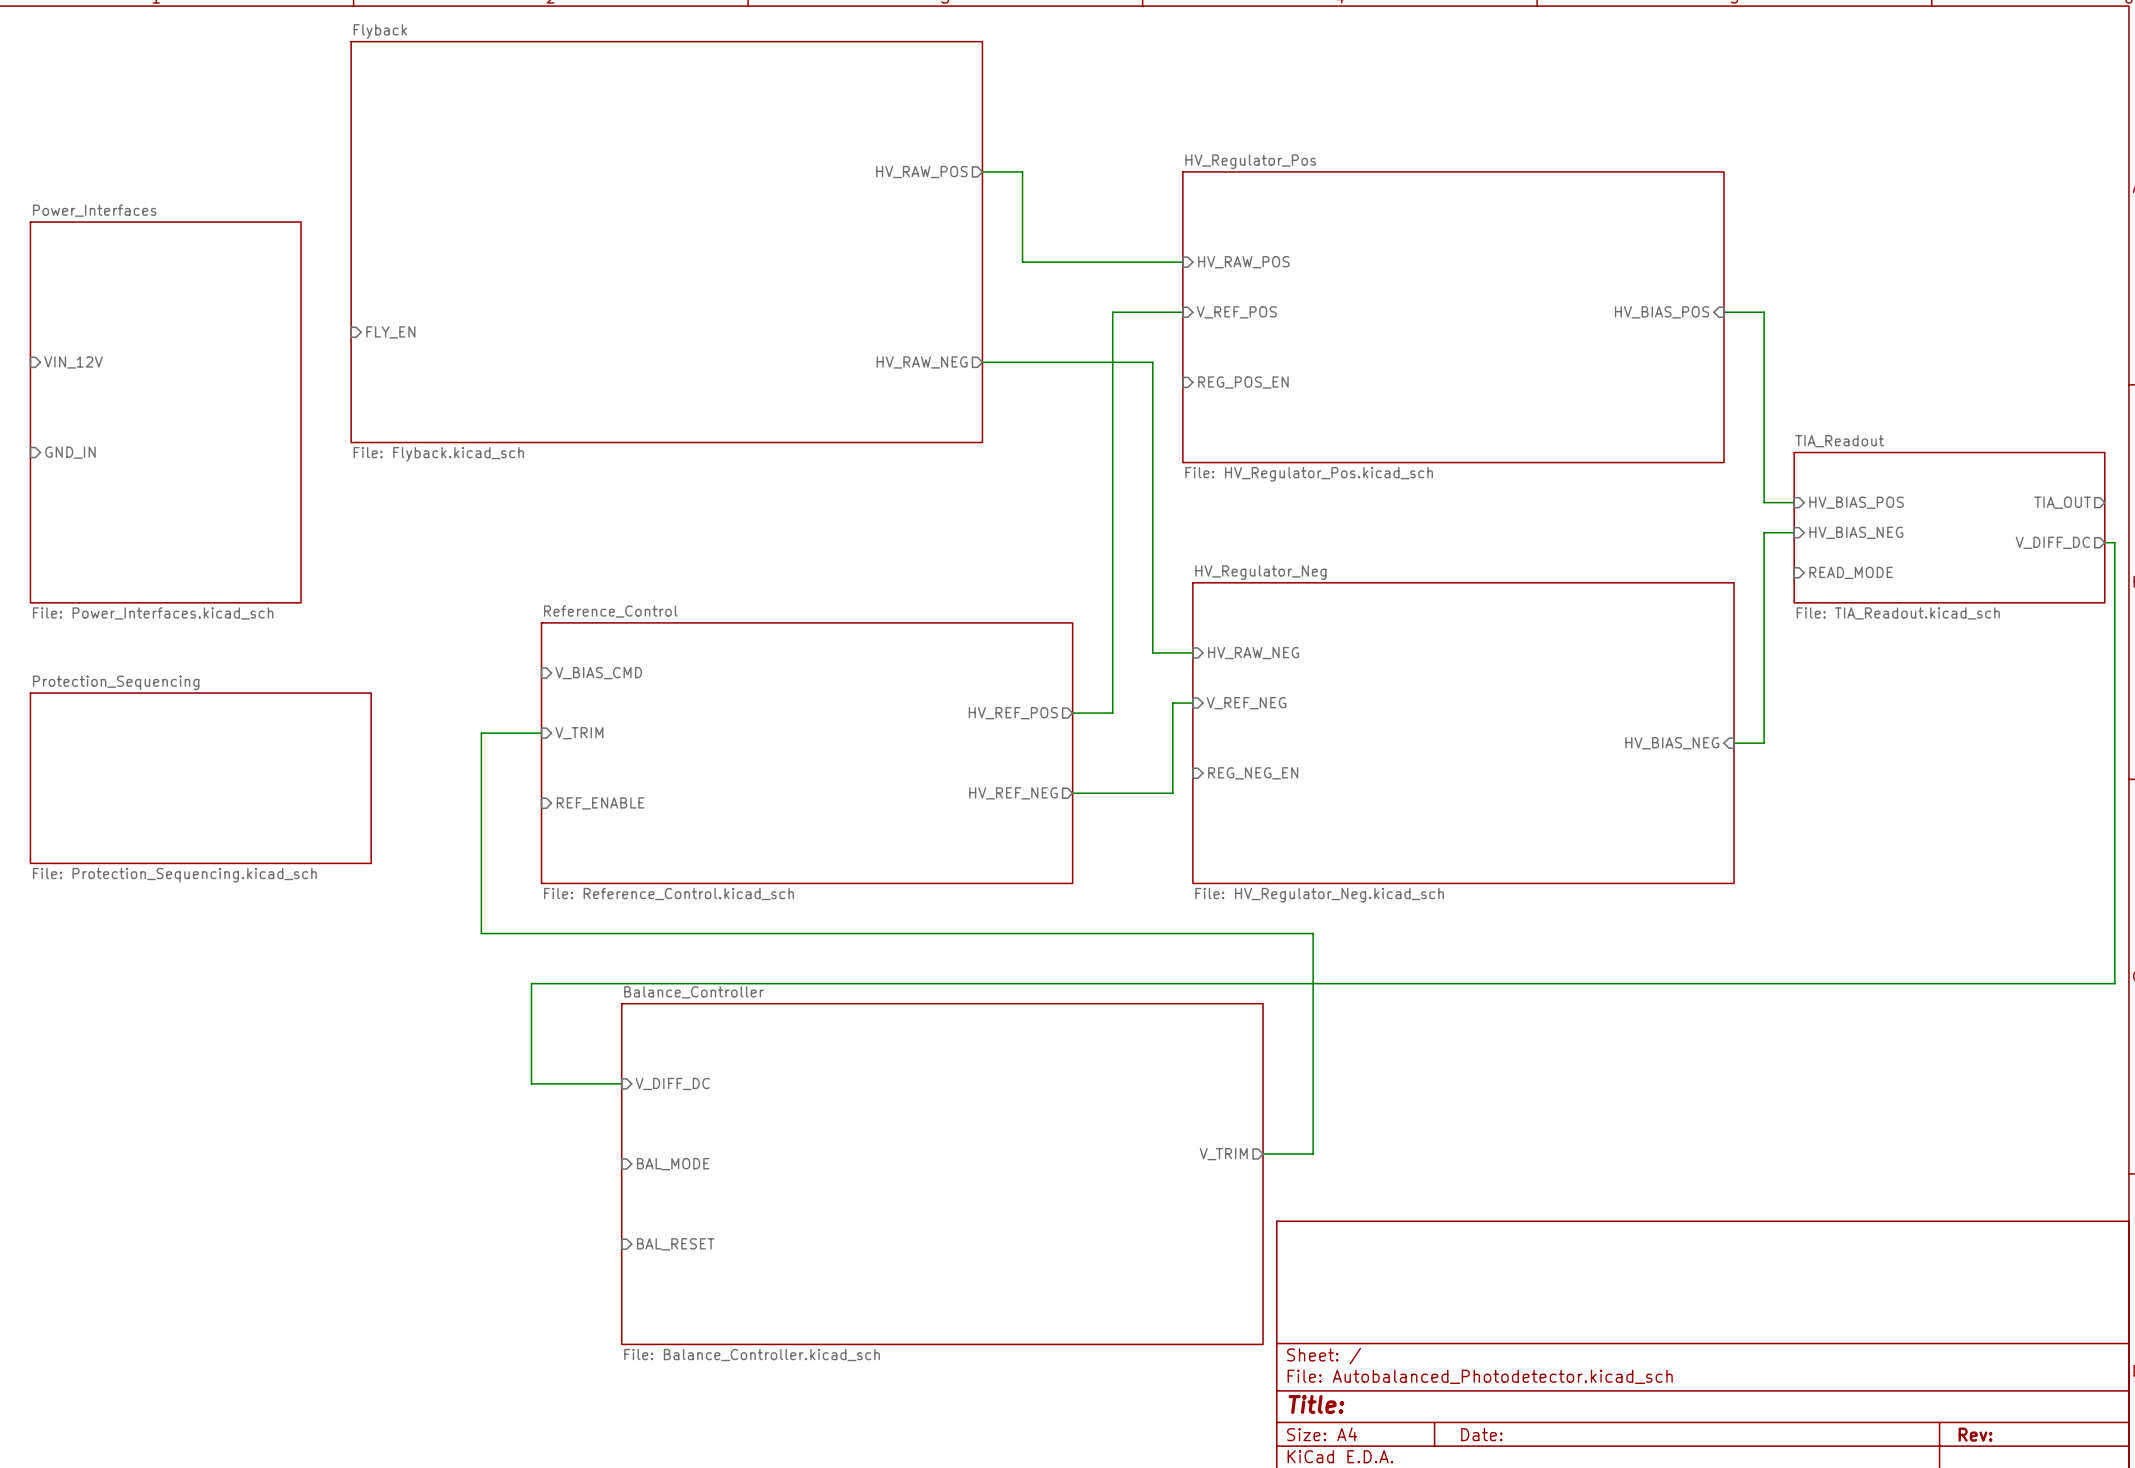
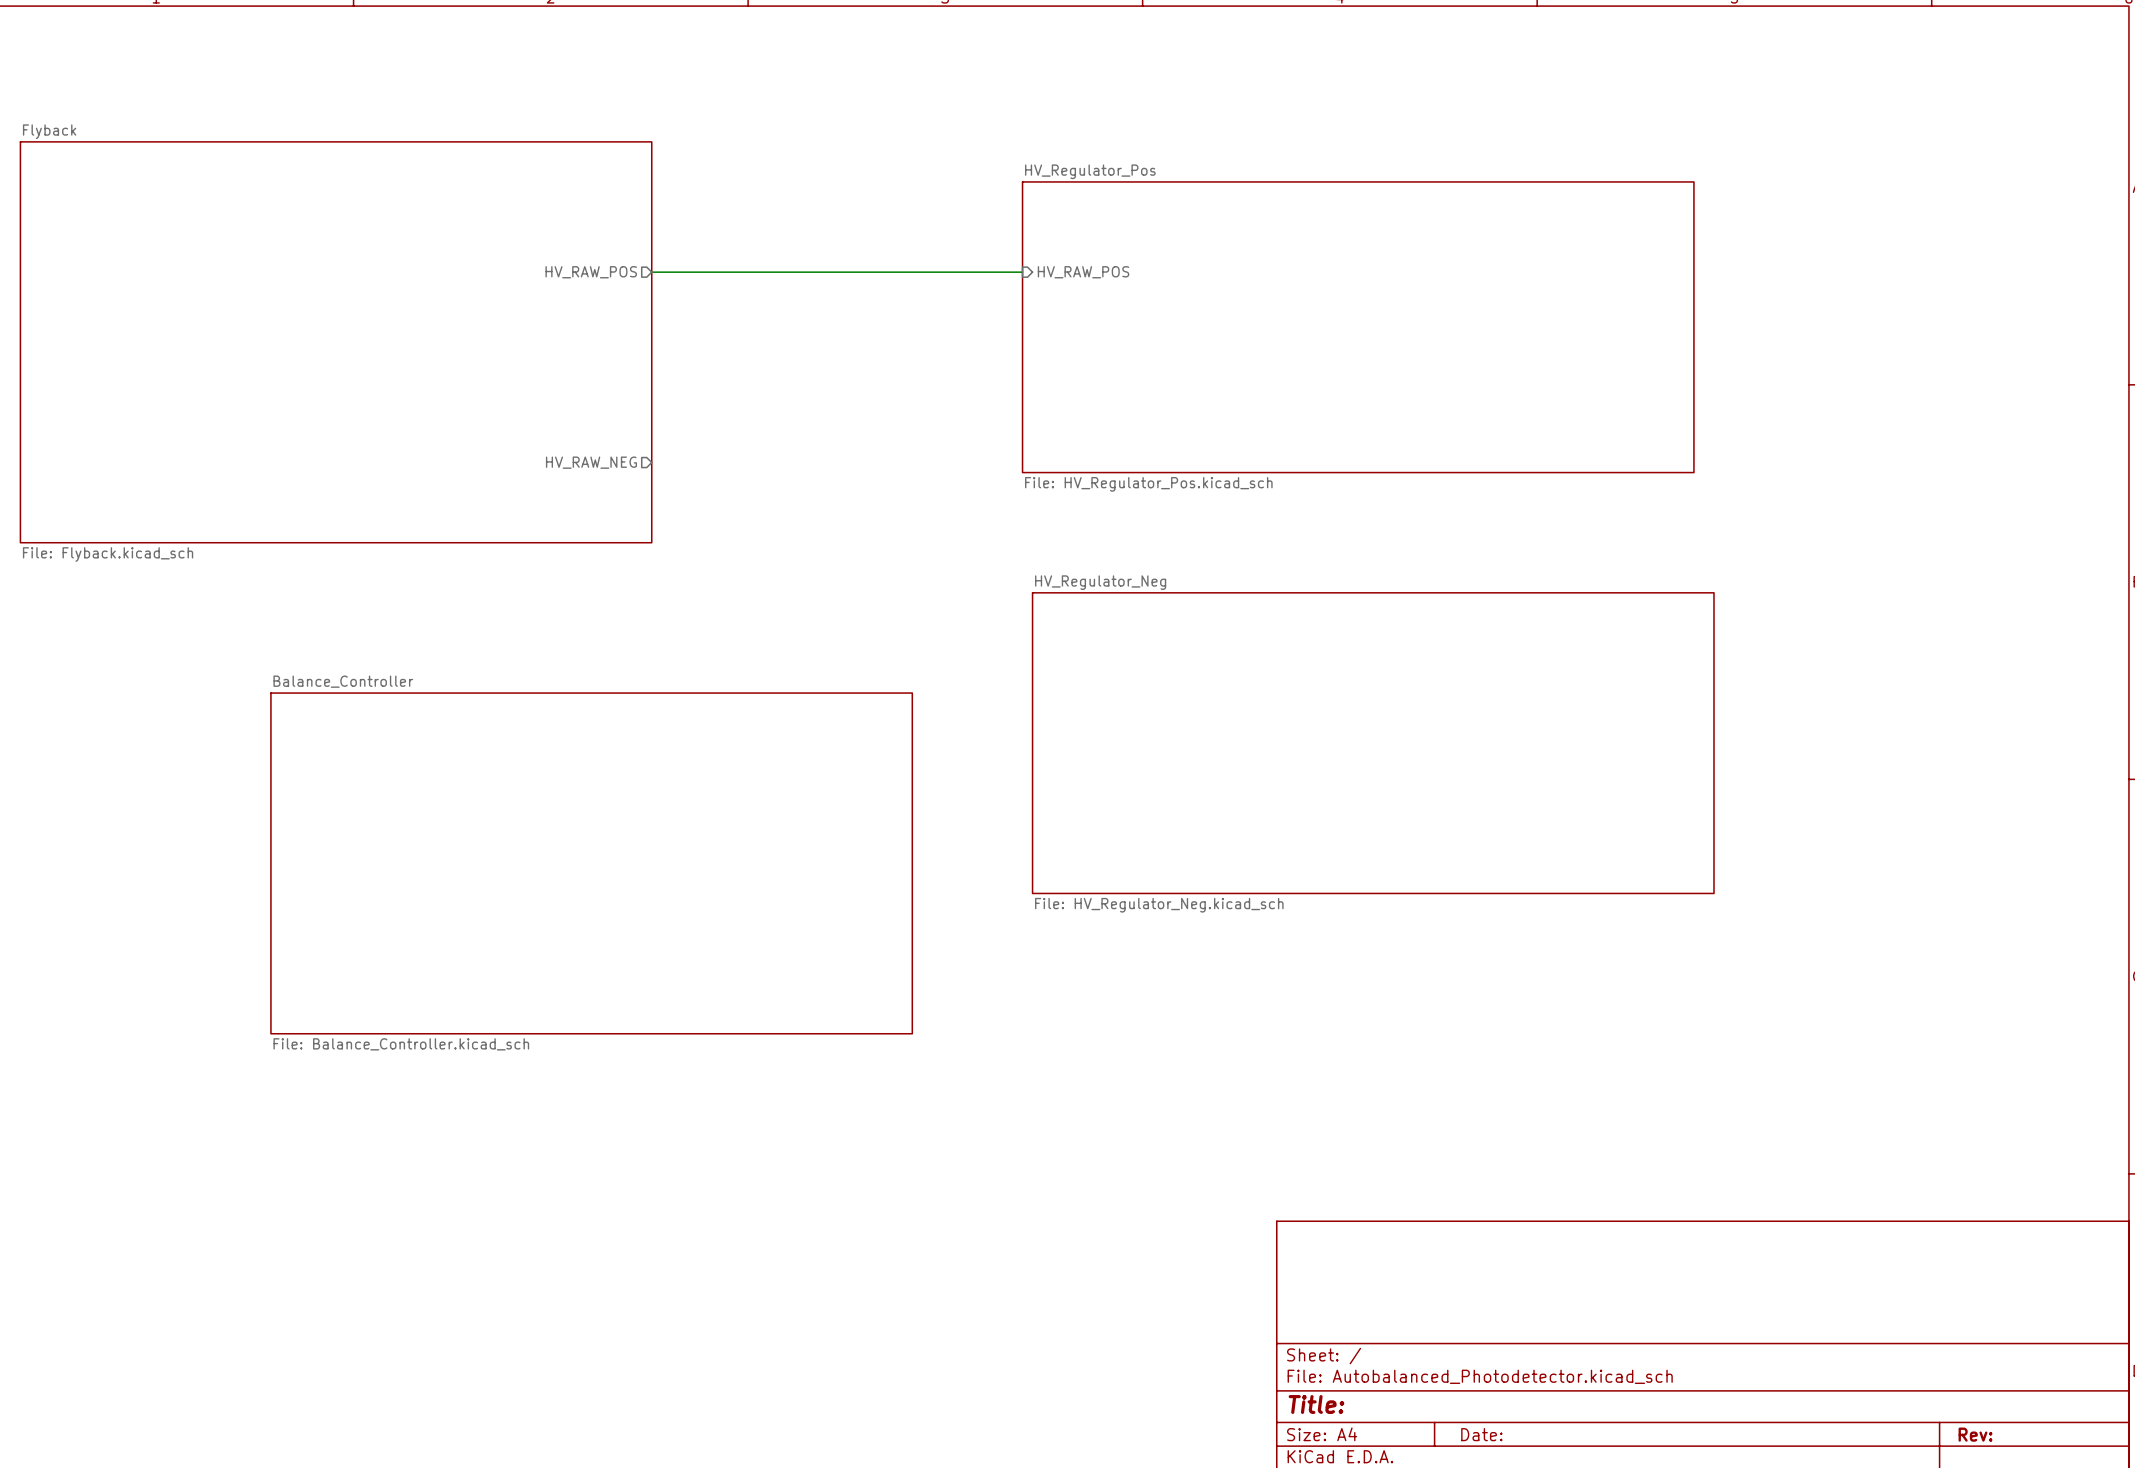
wire: (982, 171) (1022, 171) (1022, 262) (1182, 262) -> none
sheet pin: HV_RAW_POS (921, 172) -> none
sheet Flyback: File: Flyback.kicad_sch (666, 242) -> none
sheet pin: HV_RAW_POS (1243, 262) -> none
sheet pin: none -> HV_RAW_POS (591, 272)
wire: none -> (651, 272) (1022, 272)
sheet pin: none -> HV_RAW_POS (1083, 272)
wire: (1182, 312) (1112, 312) (1112, 713) (1072, 713) -> none
sheet pin: V_REF_POS (1236, 312) -> none
sheet pin: HV_BIAS_POS (1662, 312) -> none
wire: (1724, 312) (1764, 312) (1764, 502) (1794, 502) -> none
sheet HV_Regulator_Pos: File: HV_Regulator_Pos.kicad_sch (1453, 317) -> none
sheet HV_Regulator_Pos: none -> File: HV_Regulator_Pos.kicad_sch (1358, 327)
sheet pin: FLY_EN (390, 332) -> none
sheet Flyback: none -> File: Flyback.kicad_sch (336, 342)
sheet pin: VIN_12V (73, 362) -> none
sheet pin: HV_RAW_NEG (922, 362) -> none
wire: (982, 362) (1152, 362) (1152, 652) (1192, 652) -> none
sheet pin: REG_POS_EN (1243, 382) -> none
sheet Power_Interfaces: File: Power_Interfaces.kicad_sch (165, 412) -> none
sheet pin: GND_IN (70, 452) -> none
sheet pin: none -> HV_RAW_NEG (591, 462)
sheet pin: HV_BIAS_POS (1856, 502) -> none
sheet pin: TIA_OUT (2062, 502) -> none
sheet TIA_Readout: File: TIA_Readout.kicad_sch (1949, 527) -> none
wire: (1794, 532) (1764, 532) (1764, 743) (1734, 743) -> none
sheet pin: HV_BIAS_NEG (1856, 532) -> none
sheet pin: V_DIFF_DC (2052, 542) -> none
wire: (2104, 542) (2114, 542) (2114, 983) (531, 983) (531, 1083) (621, 1083) -> none
sheet pin: READ_MODE (1851, 572) -> none
sheet pin: HV_RAW_NEG (1253, 653) -> none
sheet pin: V_BIAS_CMD (598, 673) -> none
wire: (1192, 703) (1172, 703) (1172, 793) (1072, 793) -> none
sheet pin: V_REF_NEG (1246, 703) -> none
sheet pin: HV_REF_POS (1013, 713) -> none
wire: (541, 733) (481, 733) (481, 933) (1313, 933) (1313, 1154) (1263, 1154) -> none
sheet pin: V_TRIM (579, 733) -> none
sheet HV_Regulator_Neg: File: HV_Regulator_Neg.kicad_sch (1463, 733) -> none
sheet HV_Regulator_Neg: none -> File: HV_Regulator_Neg.kicad_sch (1373, 743)
sheet pin: HV_BIAS_NEG (1672, 743) -> none
sheet Reference_Control: File: Reference_Control.kicad_sch (807, 753) -> none
sheet pin: REG_NEG_EN (1253, 773) -> none
sheet Protection_Sequencing: File: Protection_Sequencing.kicad_sch (200, 778) -> none
sheet pin: HV_REF_NEG (1013, 793) -> none
sheet pin: REF_ENABLE (600, 803) -> none
sheet Balance_Controller: none -> File: Balance_Controller.kicad_sch (591, 863)
sheet pin: V_DIFF_DC (672, 1083) -> none
sheet pin: V_TRIM (1223, 1154) -> none
sheet pin: BAL_MODE (673, 1164) -> none
sheet Balance_Controller: File: Balance_Controller.kicad_sch (942, 1174) -> none
sheet pin: BAL_RESET (675, 1244) -> none

